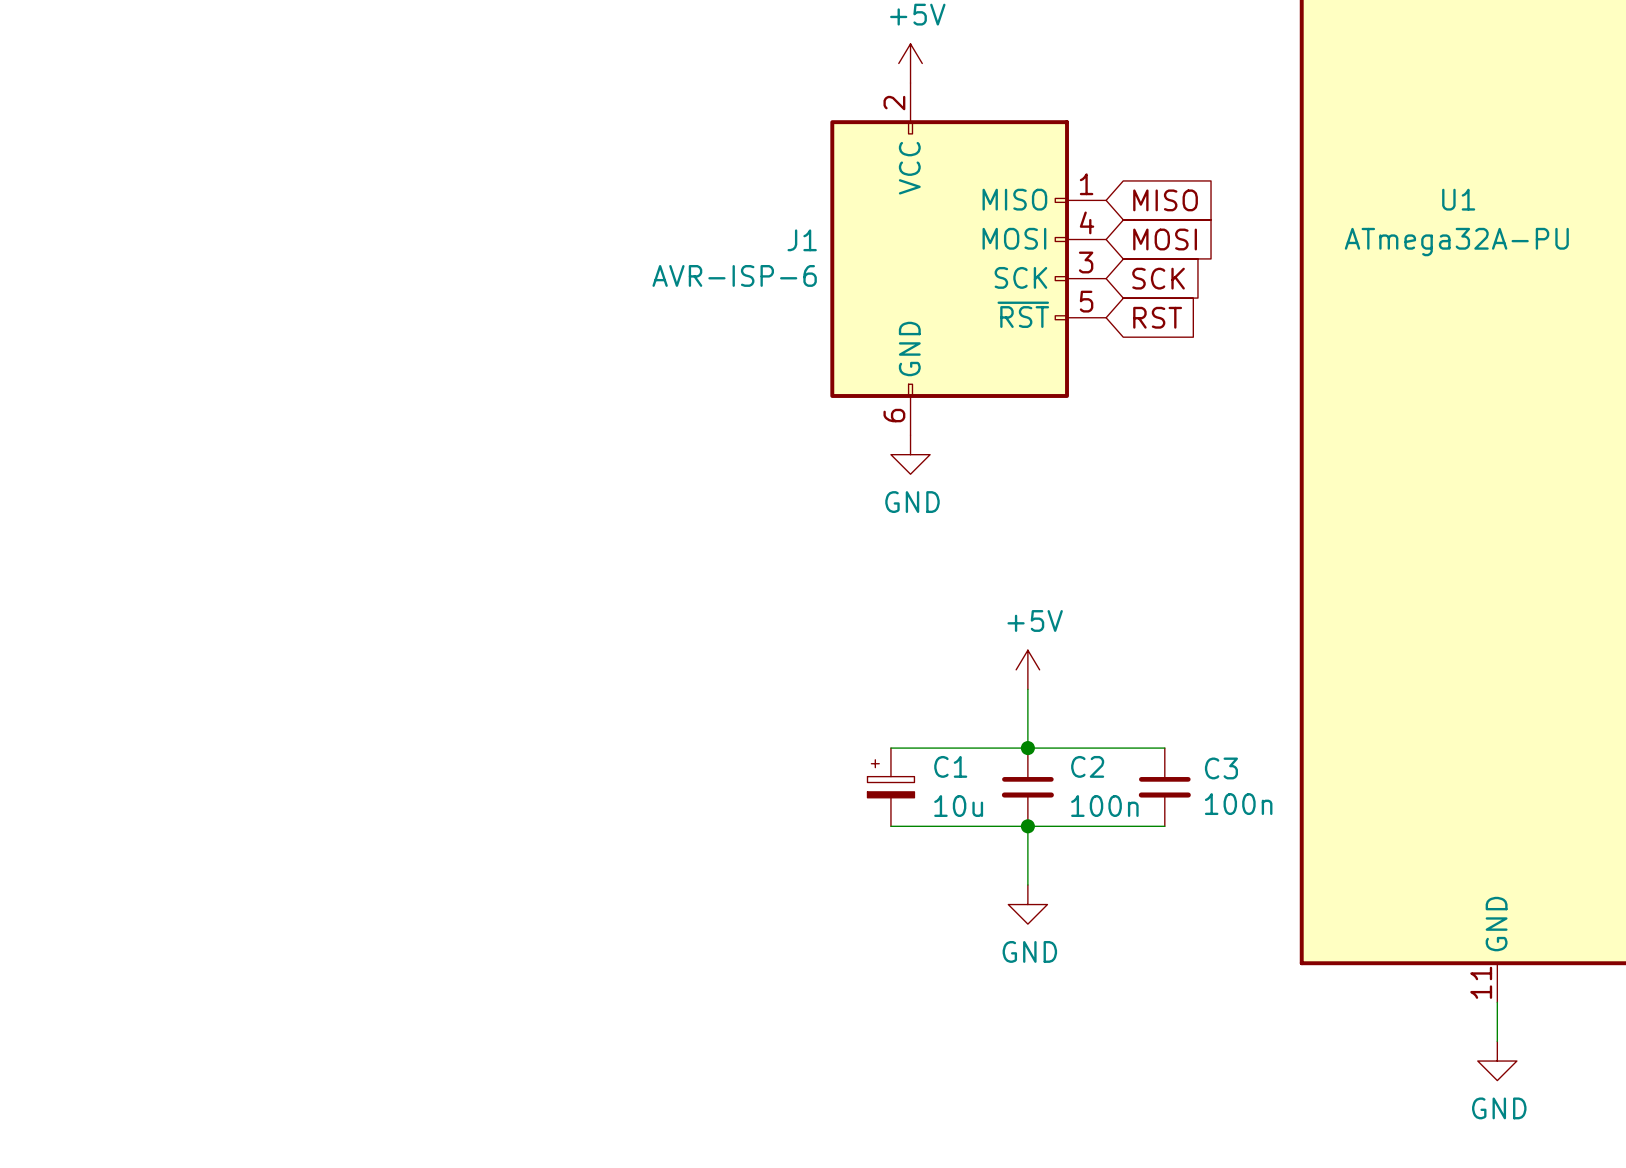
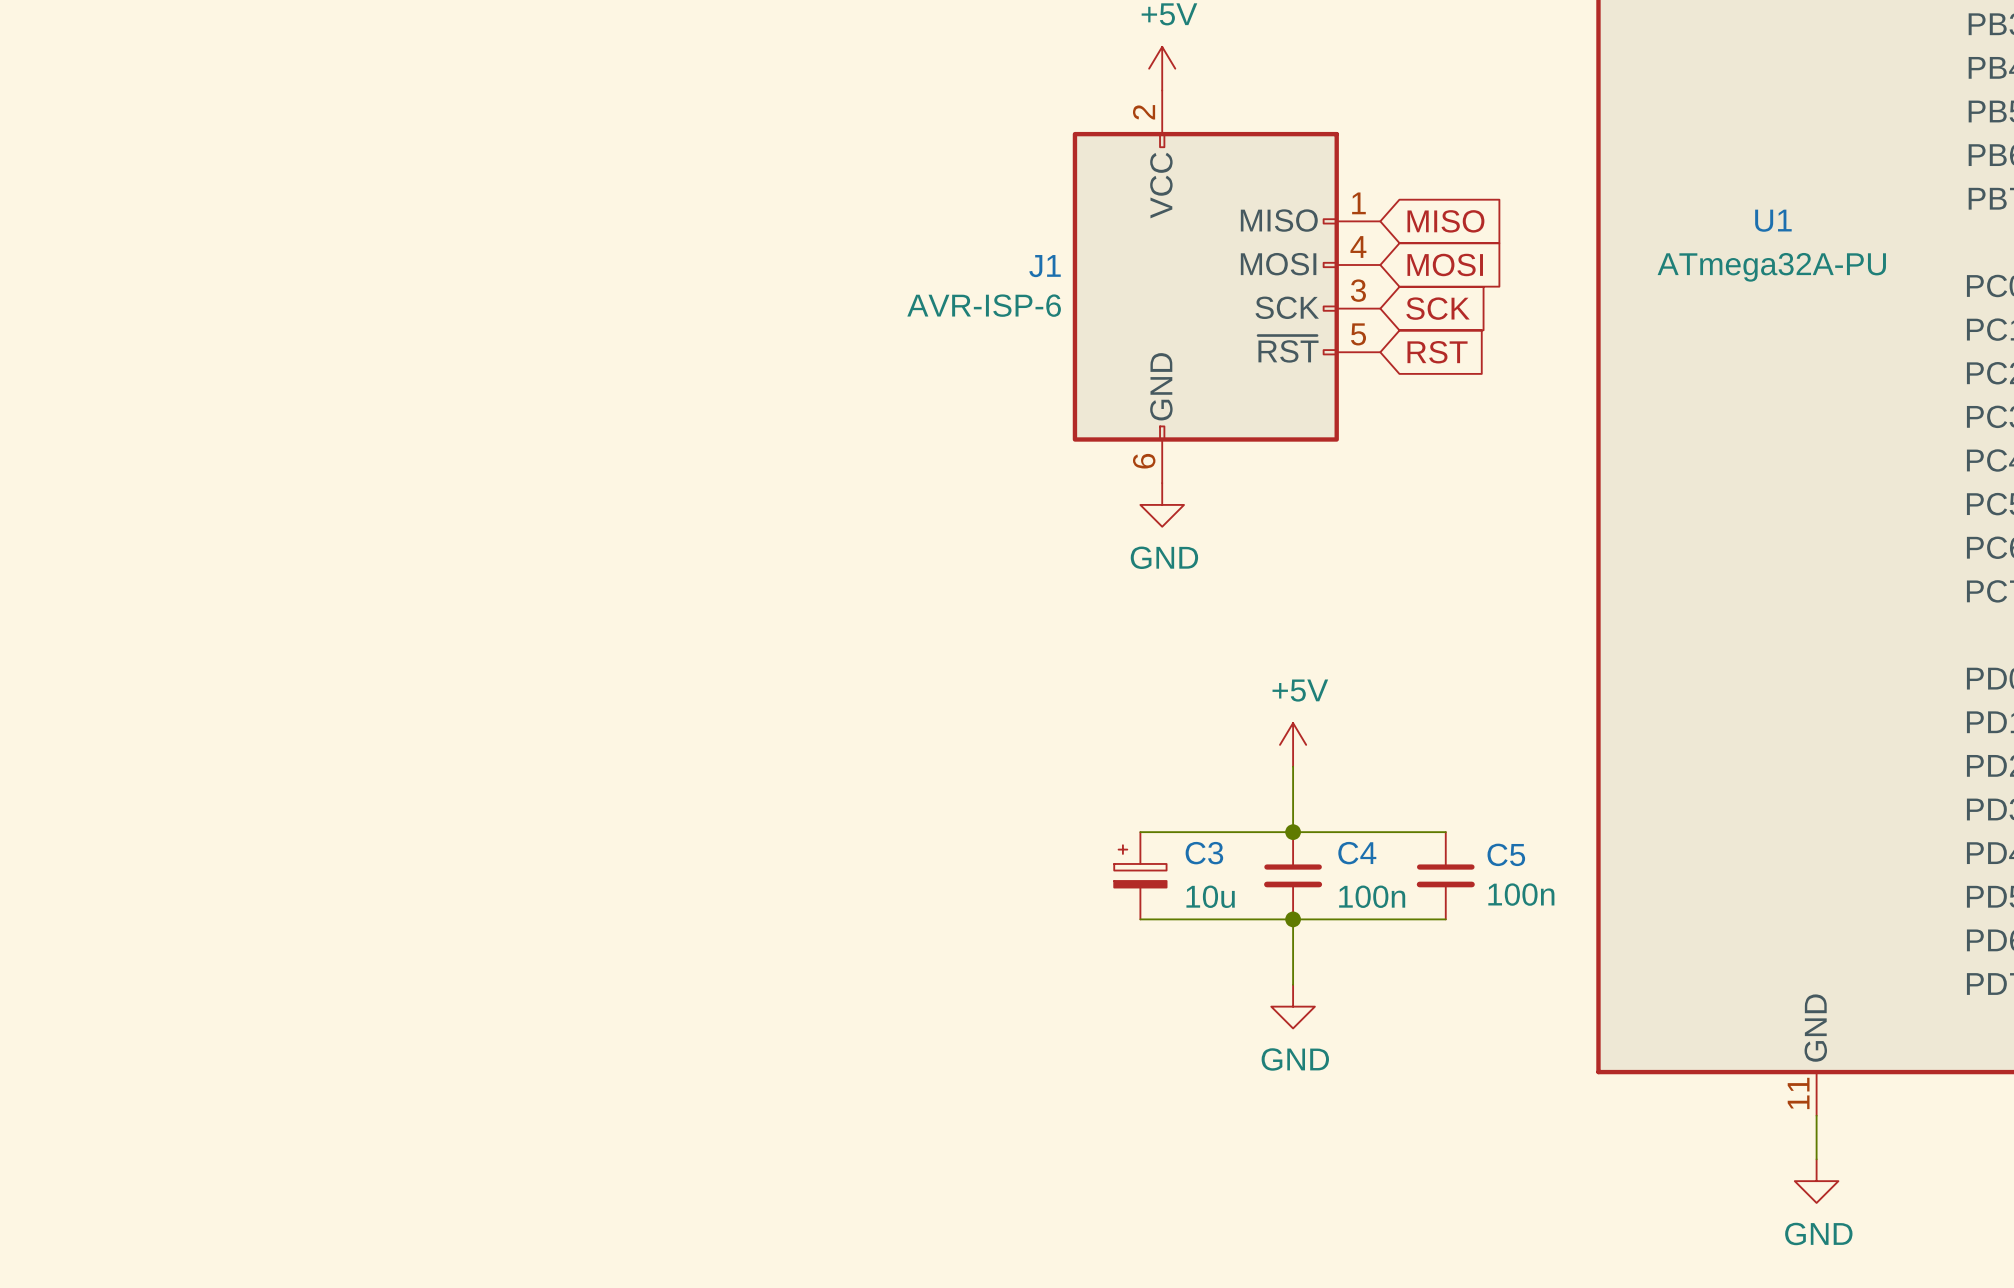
C1 name: C1 (950, 766) -> C3 (1204, 853)
C2 name: C2 (1087, 766) -> C4 (1357, 853)
C3 name: C3 (1221, 768) -> C5 (1506, 854)

